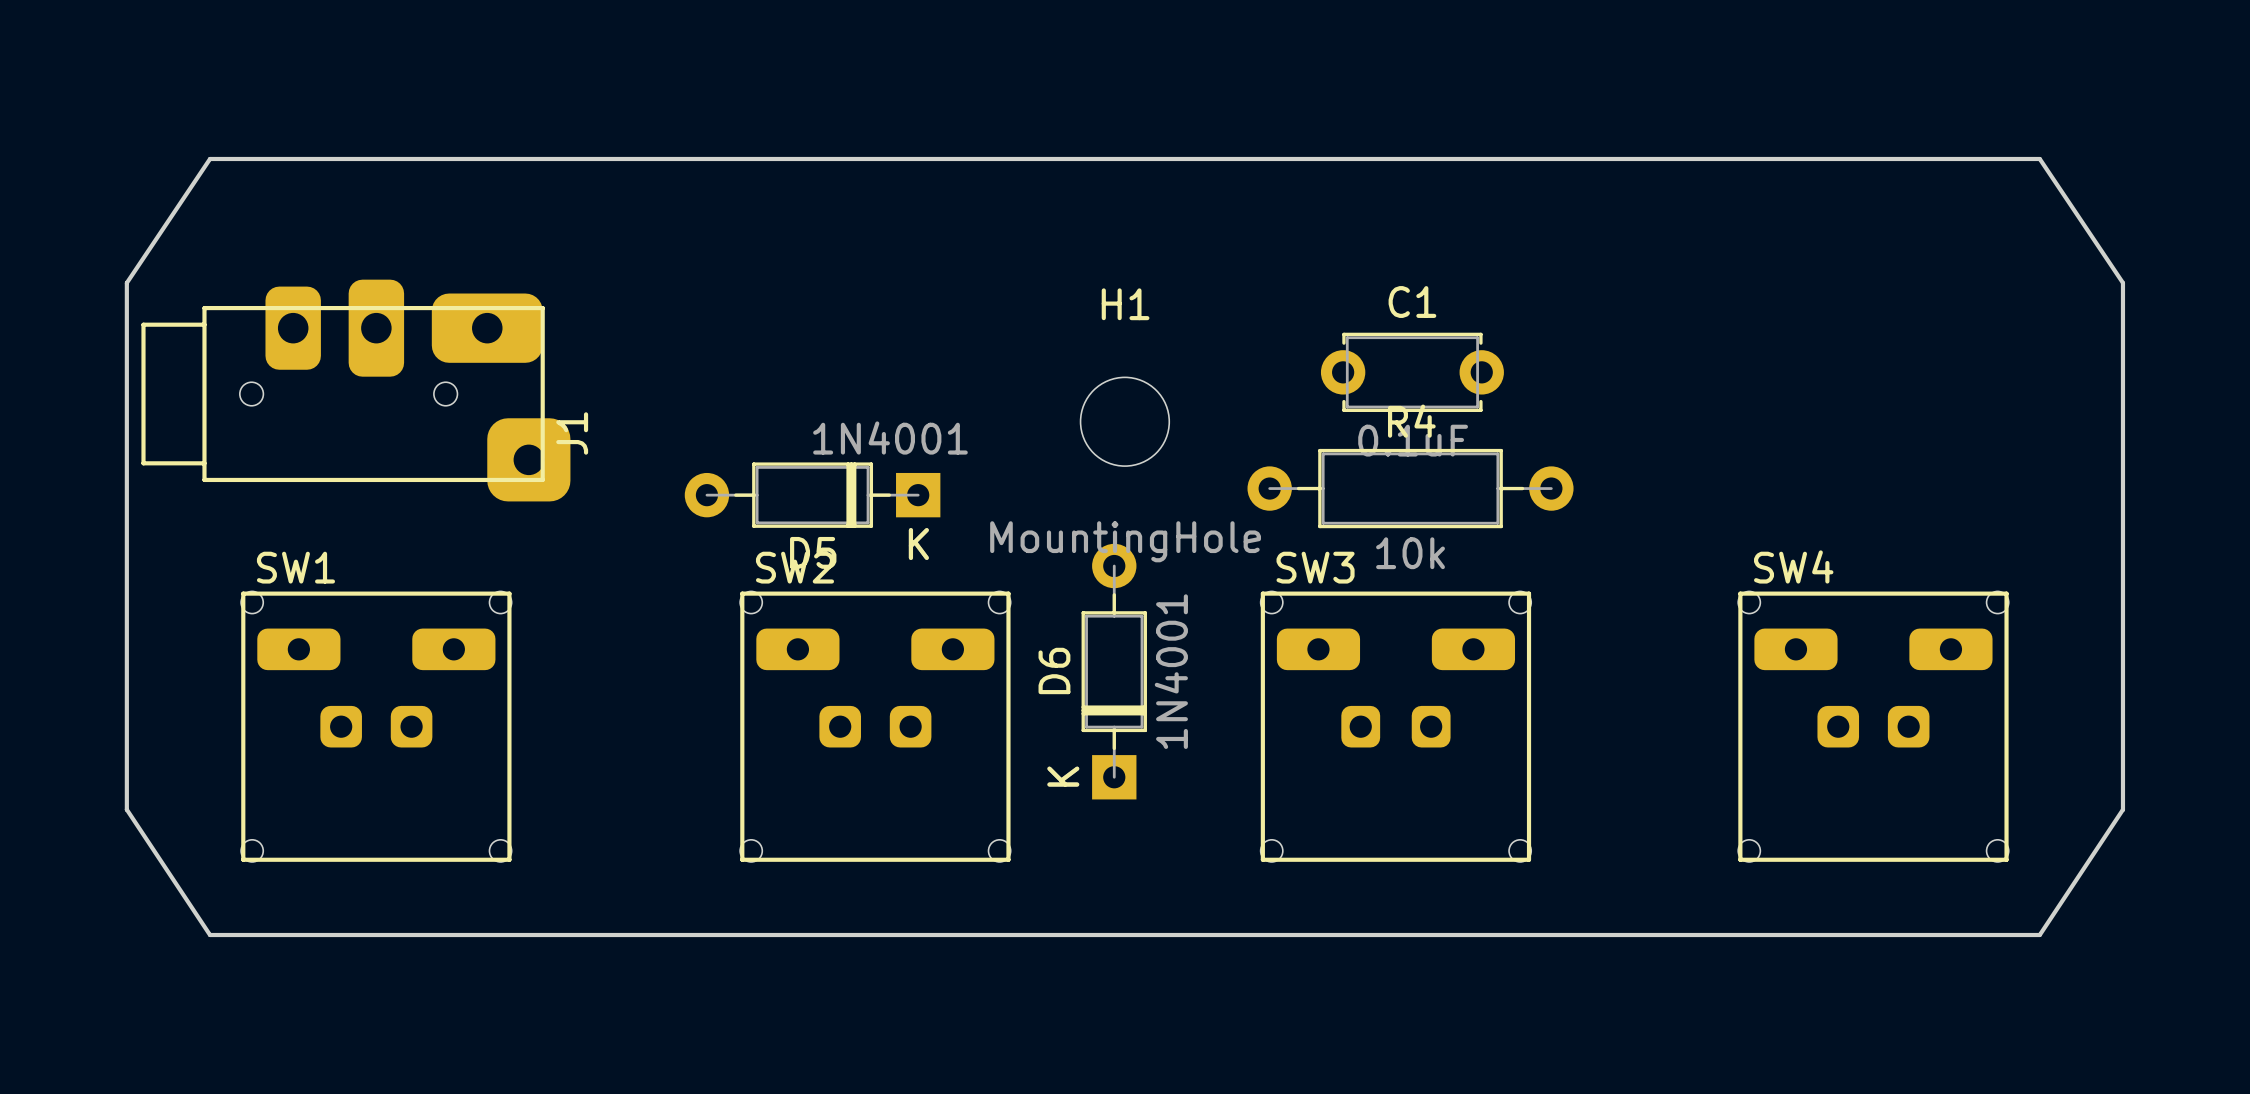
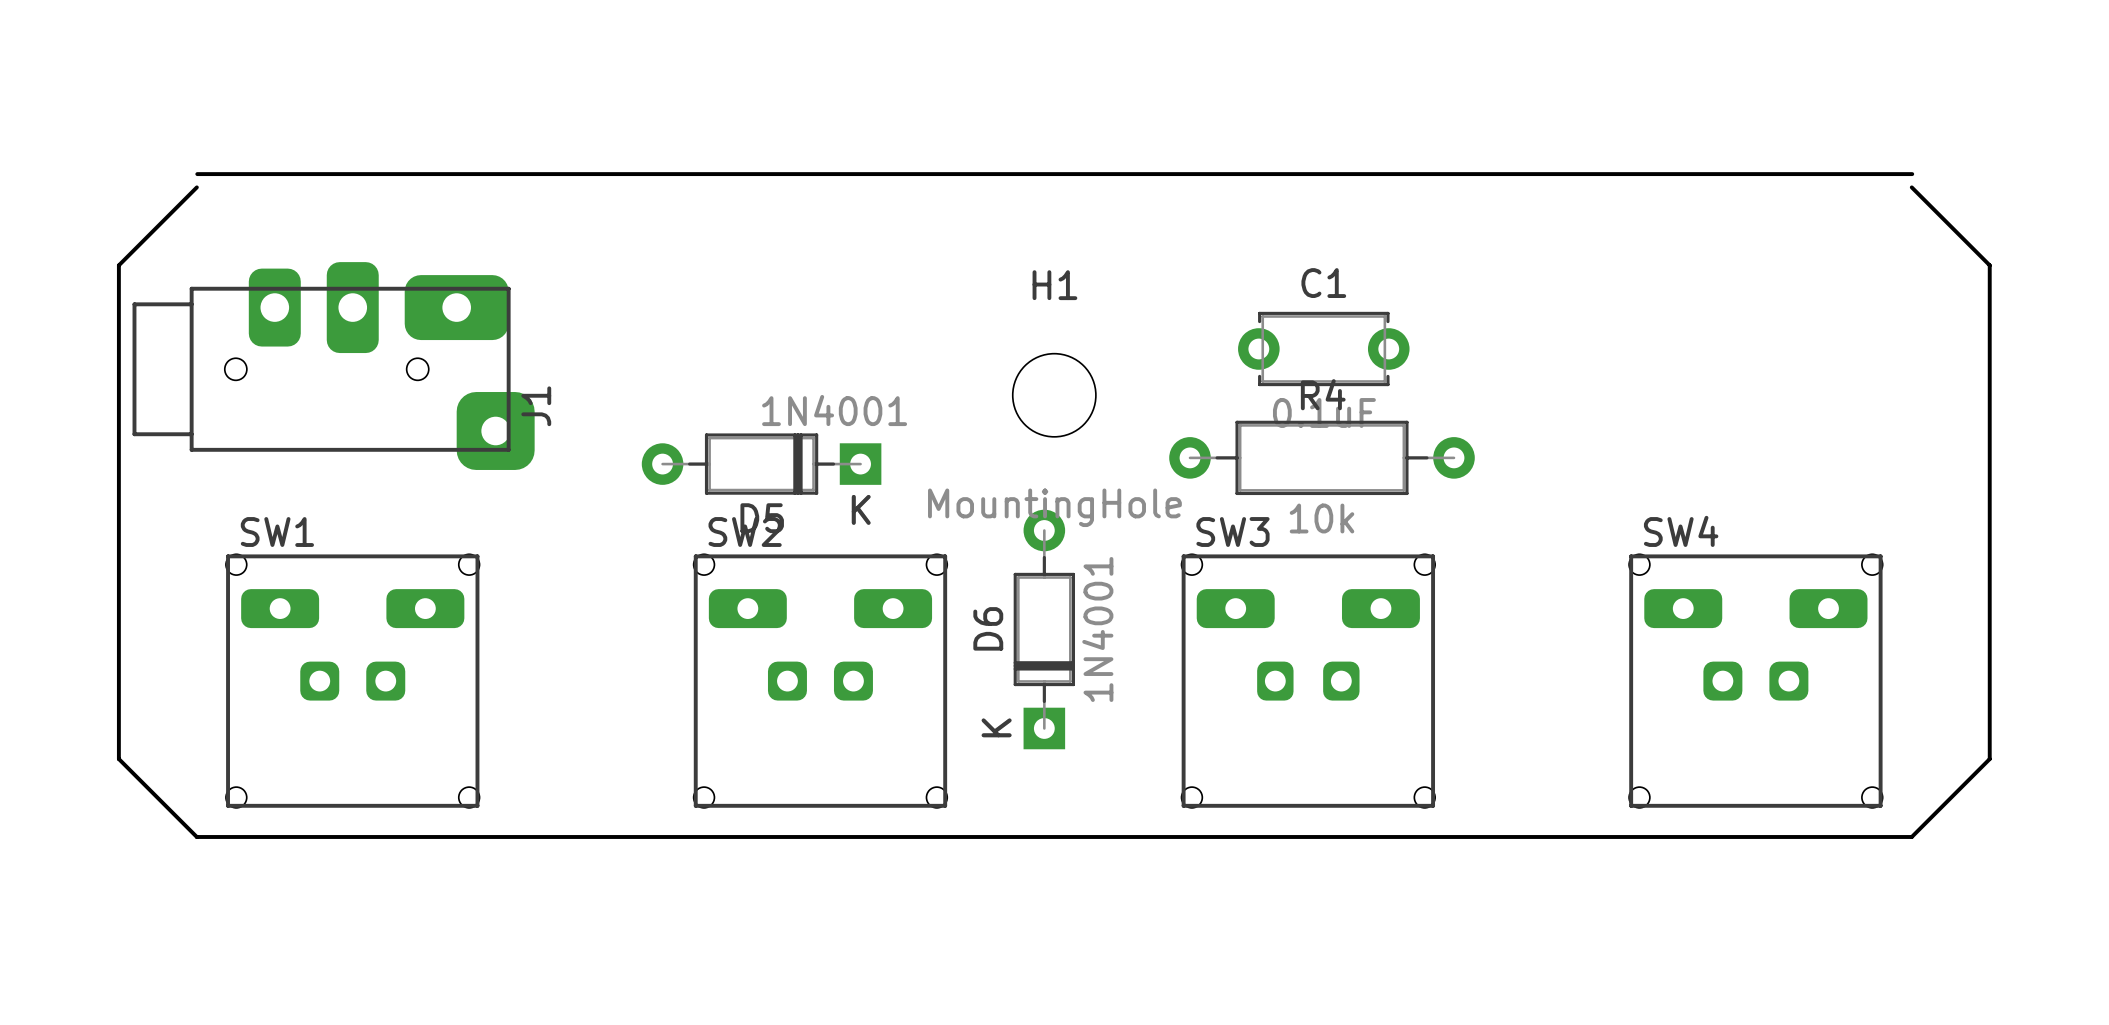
board edge: none -> (197, 174) (1912, 174)
board edge: none -> (1911, 187) (1989, 265)
board edge: (126, 282) (210, 158) (2039, 158) (2122, 282) -> (118, 265) (196, 187)
board edge: (126, 809) (210, 935) (2039, 935) (2122, 809) -> (118, 759) (196, 836) (1911, 836) (1989, 759)

